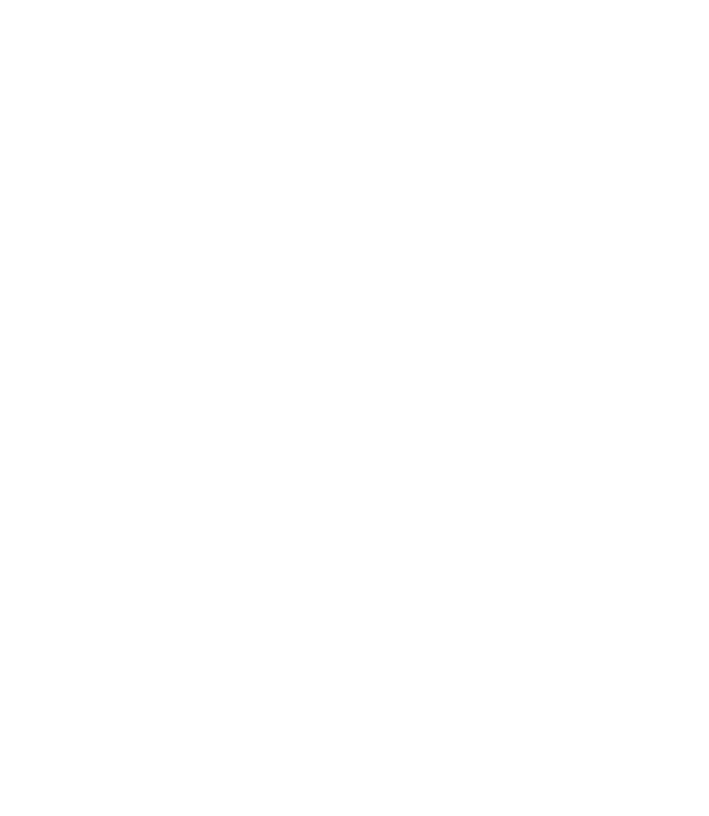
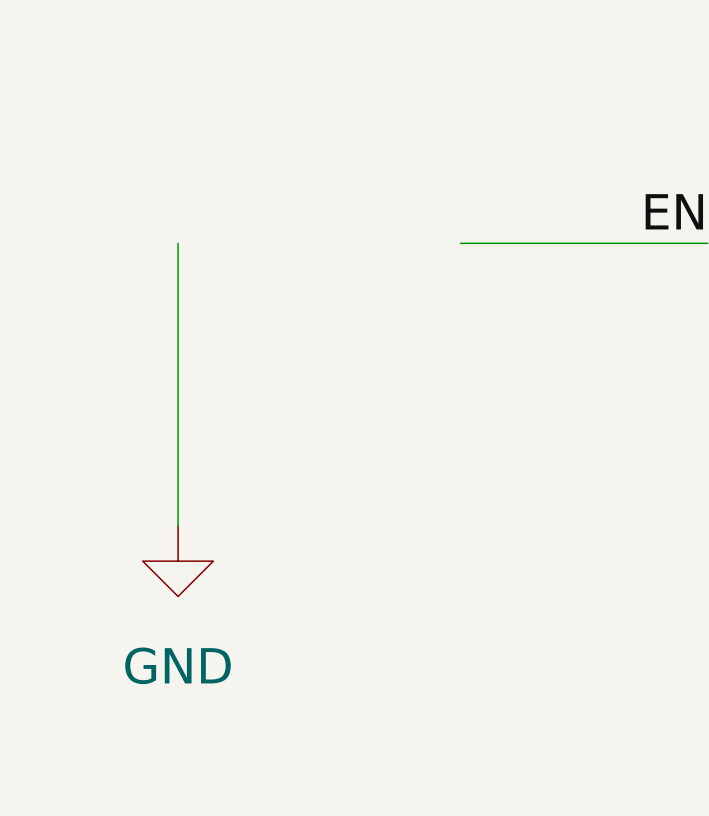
label: none -> EN (674, 211)
wire: none -> (178, 243) (178, 525)
wire: none -> (460, 243) (707, 243)
power symbol: none -> GND (178, 561)

